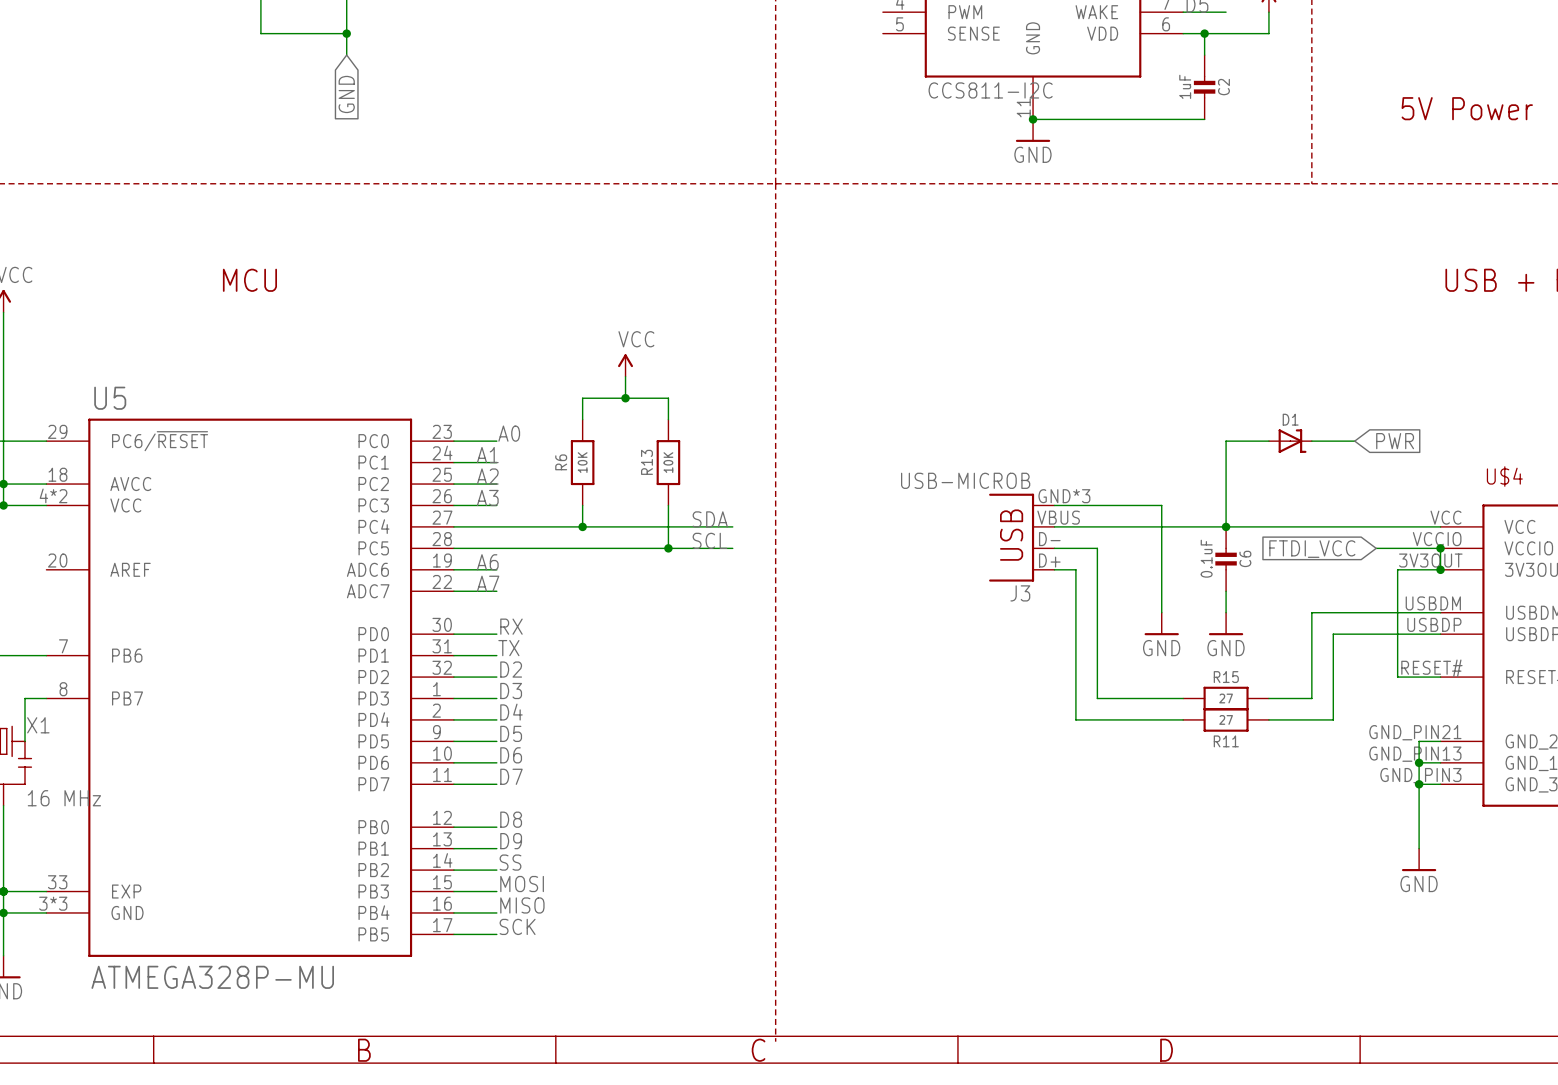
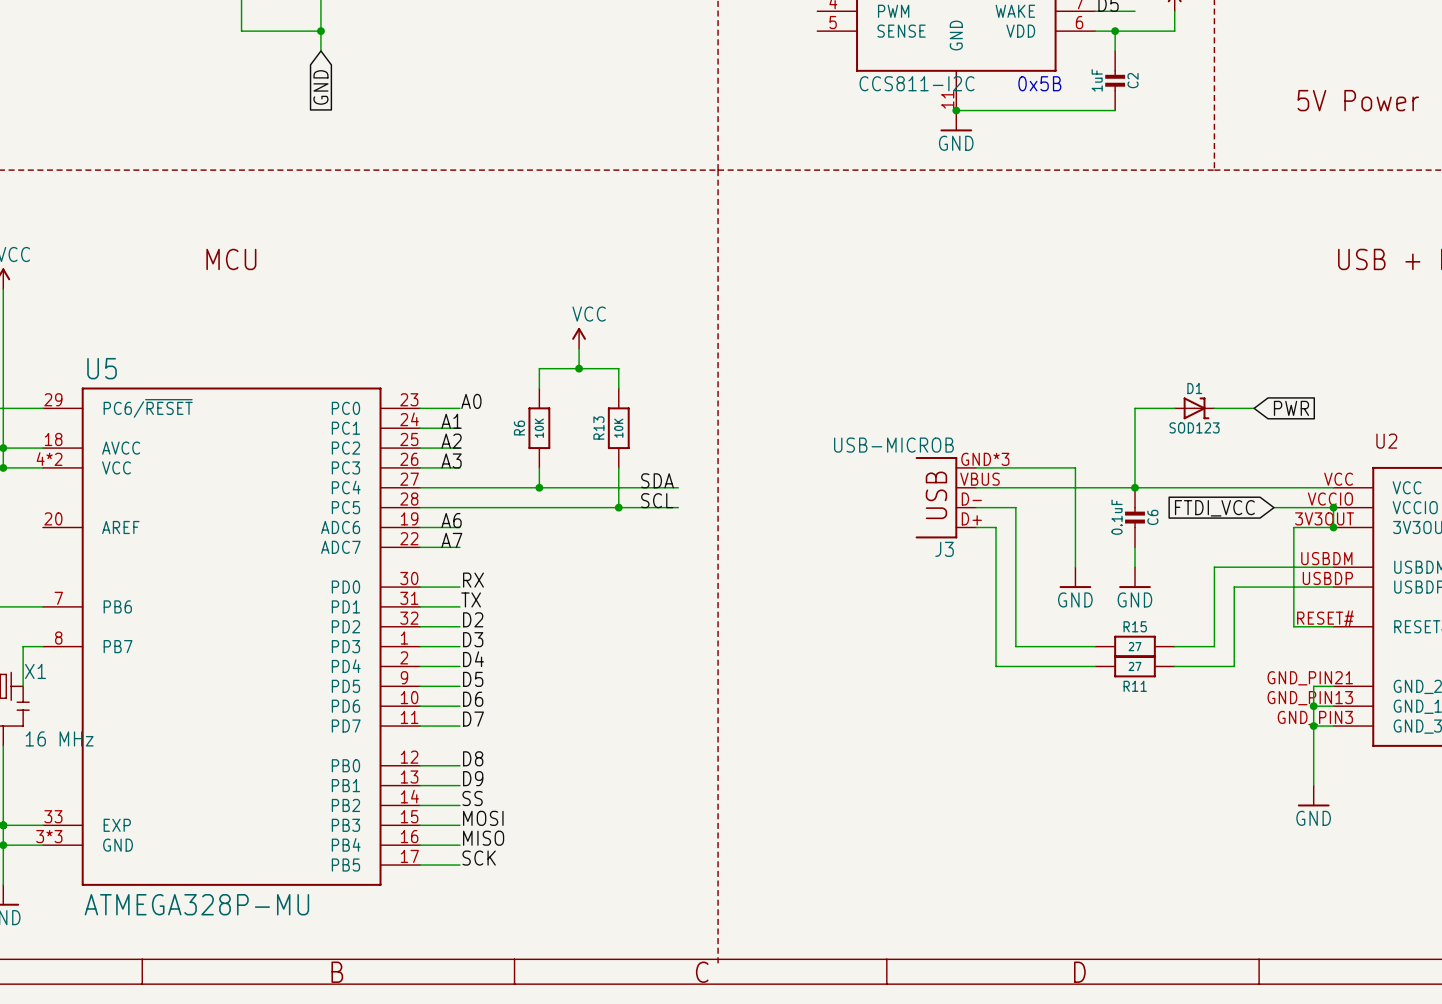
text: none -> 0x5B (1039, 83)
D1 value: none -> SOD123 (1194, 427)
U$4 name: U$4 (1504, 476) -> U2 (1386, 441)

